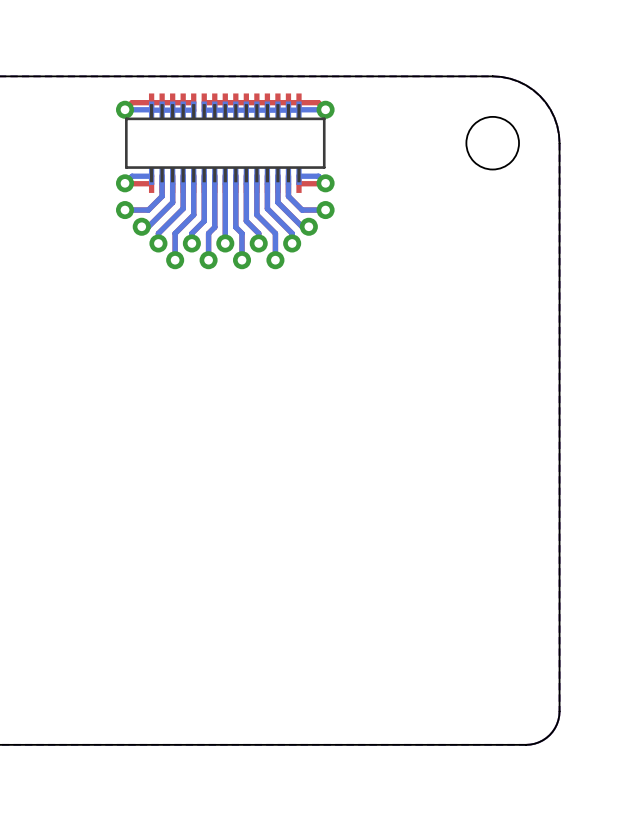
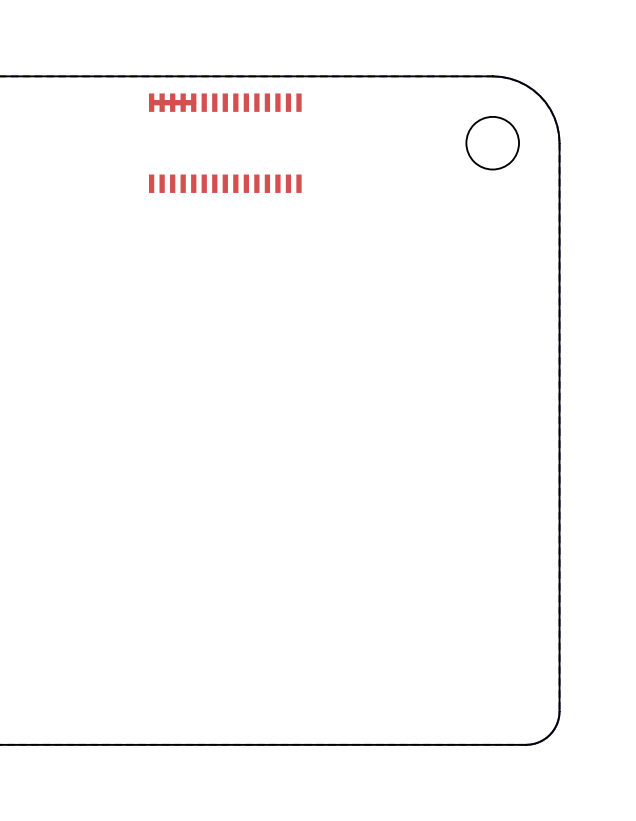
top track: none -> (193, 102) (151, 102)
part: none -> (225, 143)
part: (225, 181) -> none

